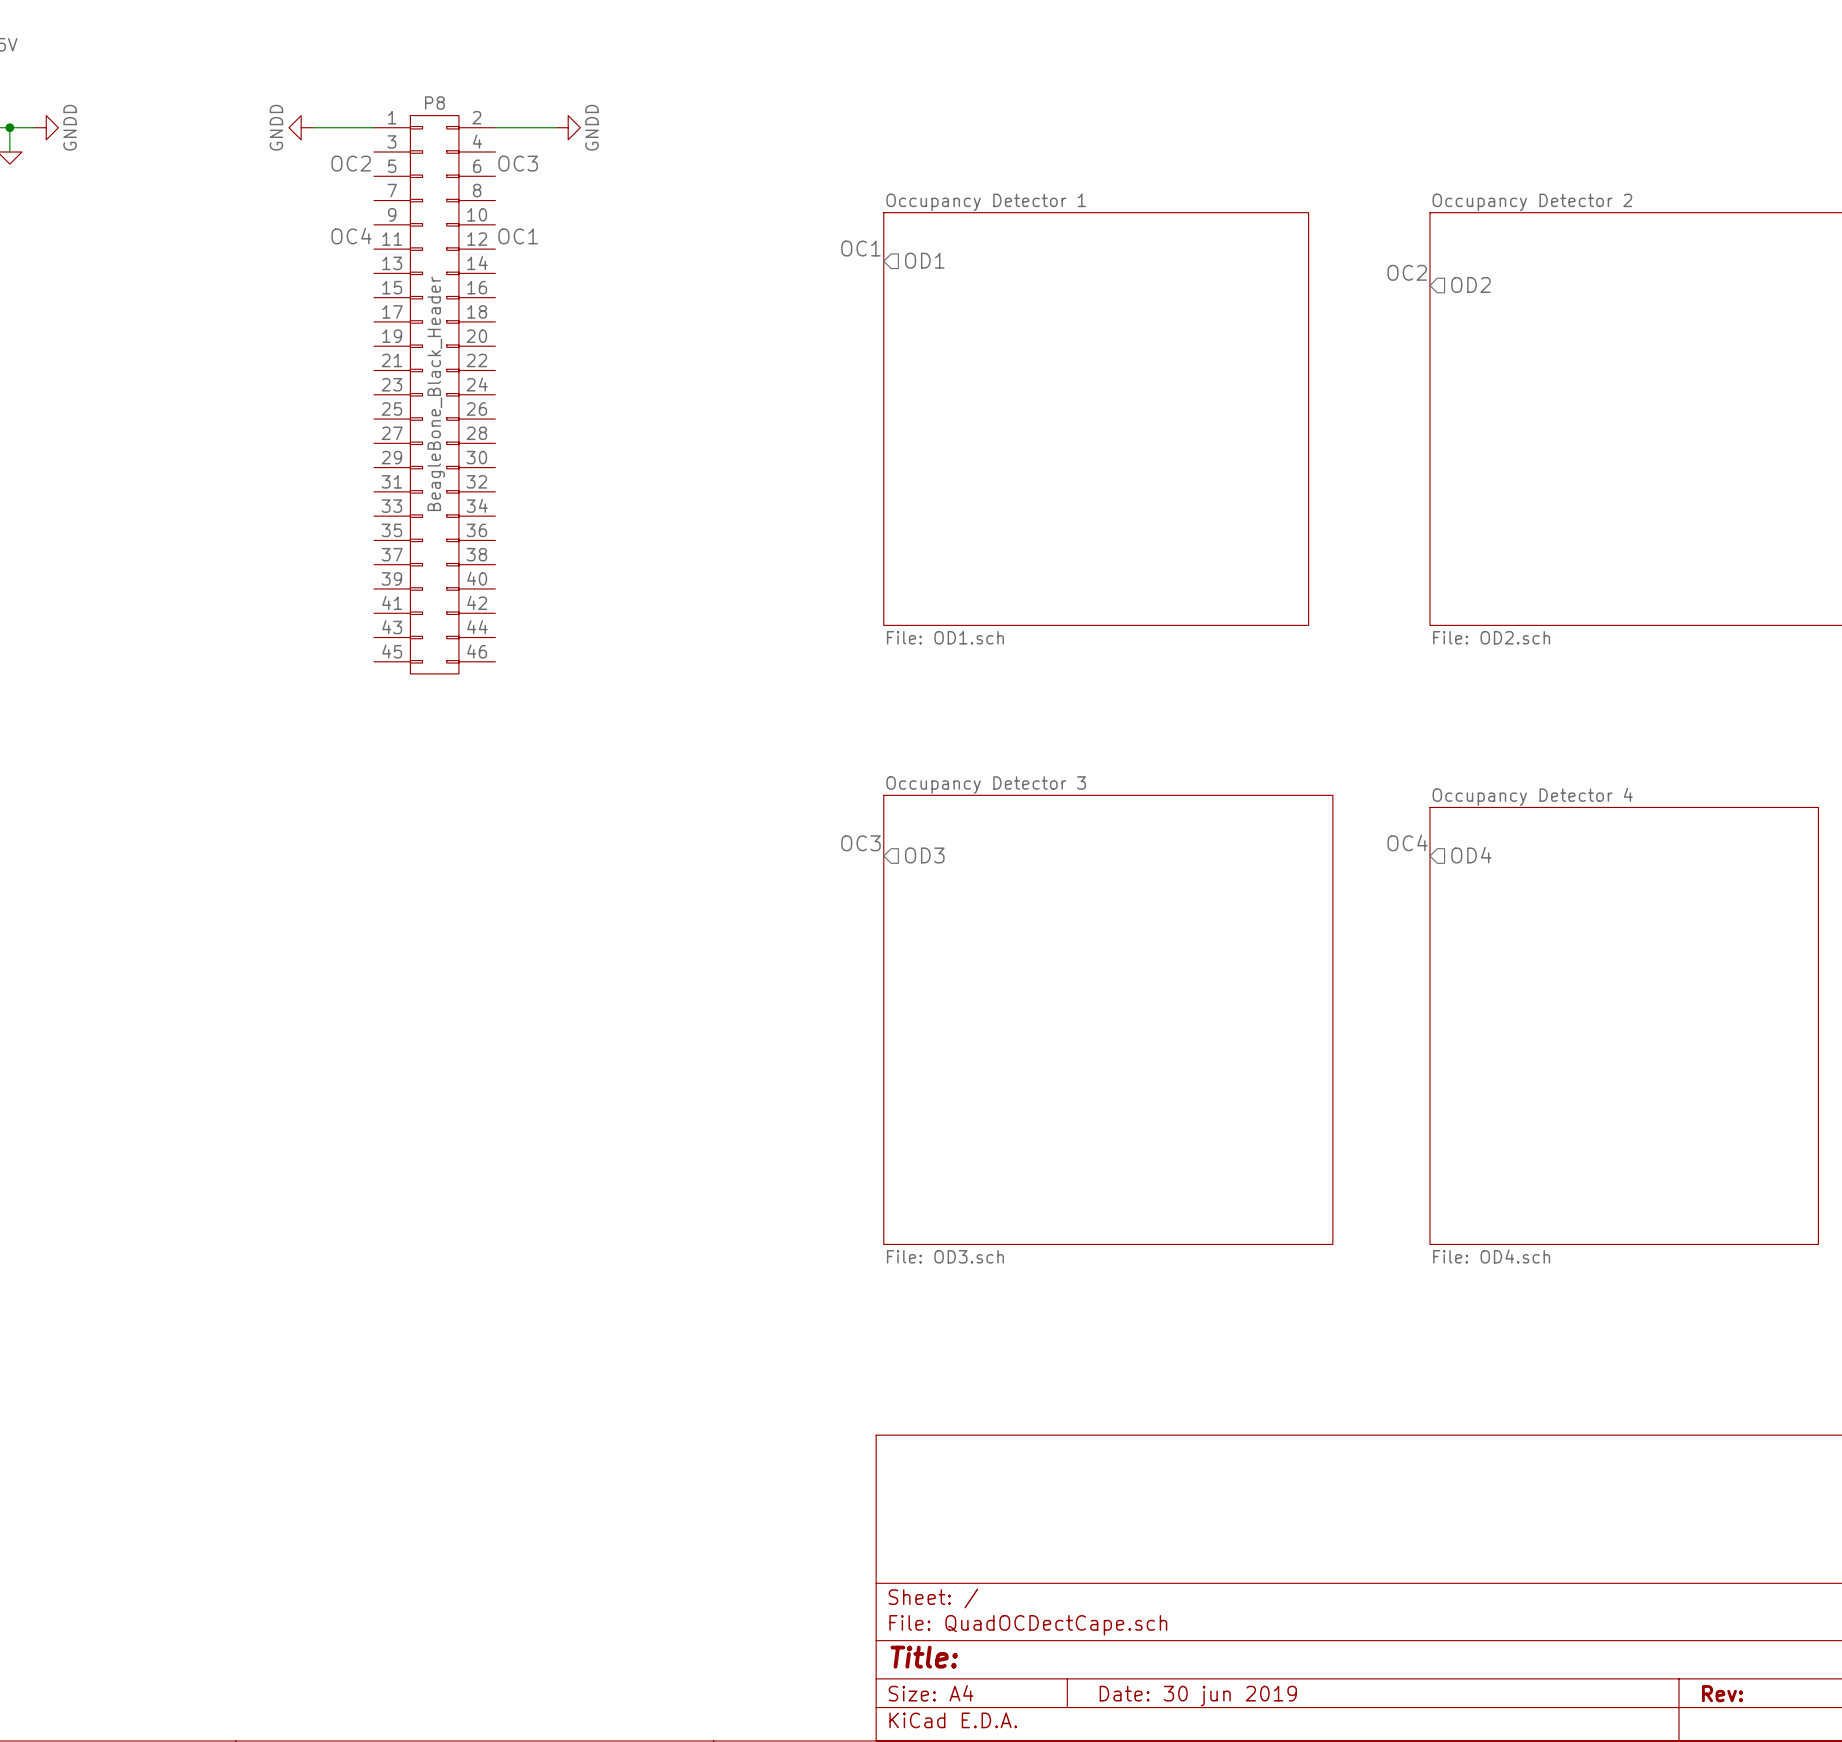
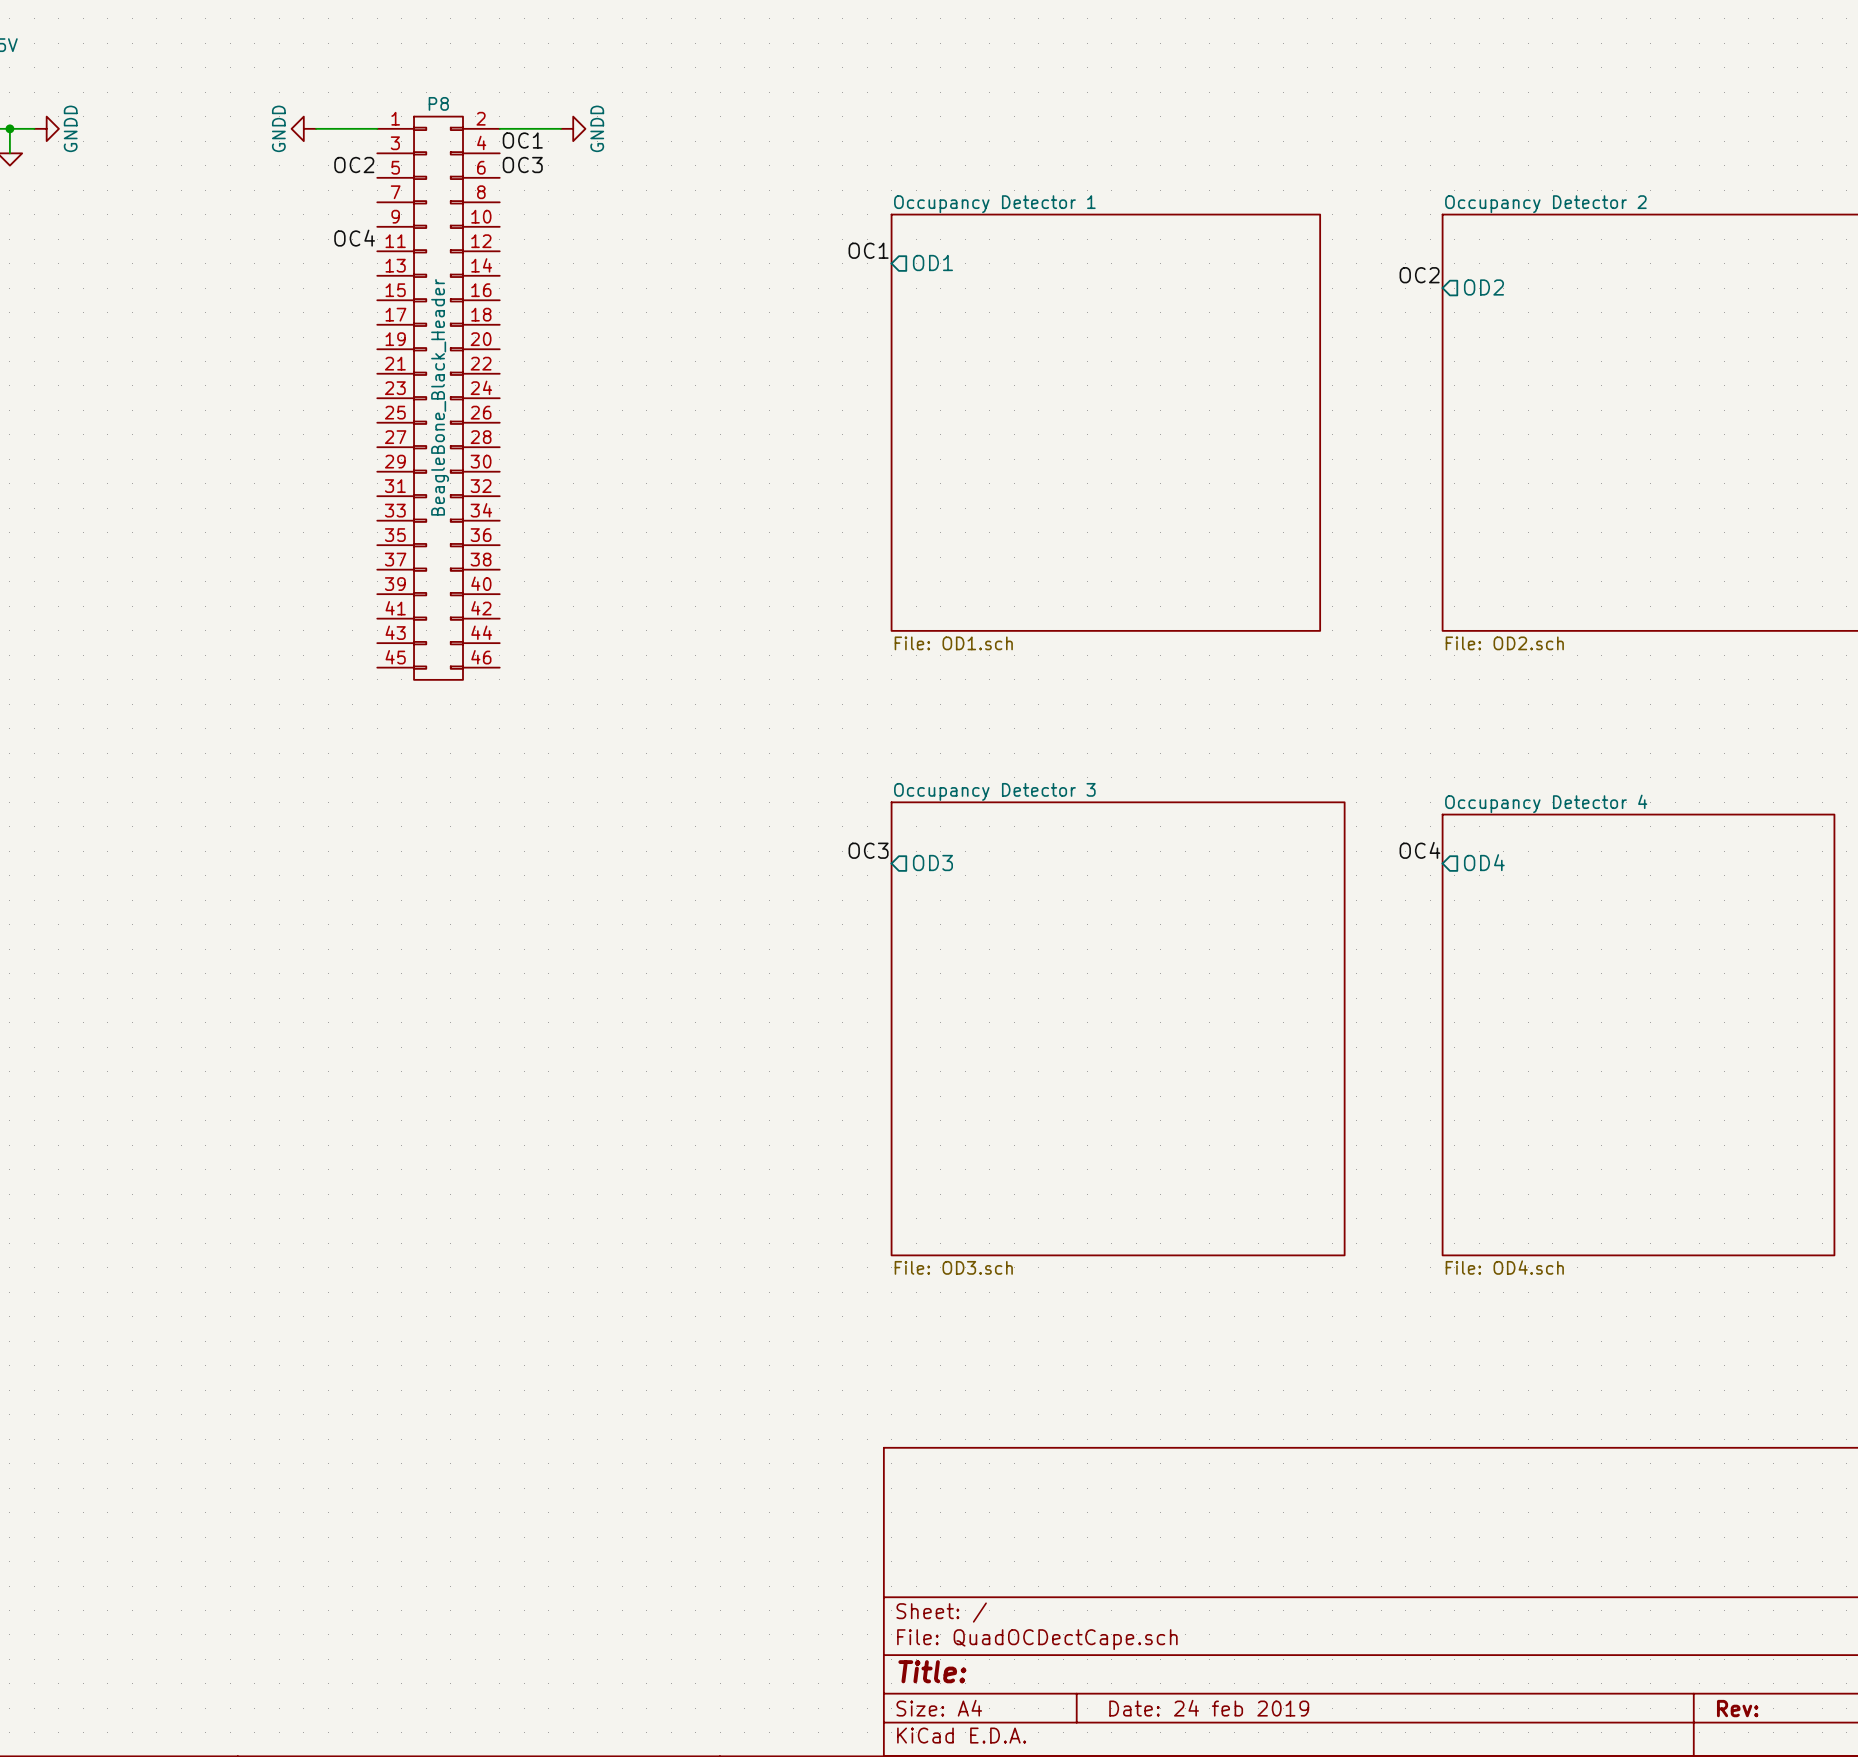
label position: OC1 (518, 236) -> OC1 (522, 140)
title block: Date: 30 jun 2019 (1198, 1696) -> Date: 24 feb 2019 (1209, 1708)

